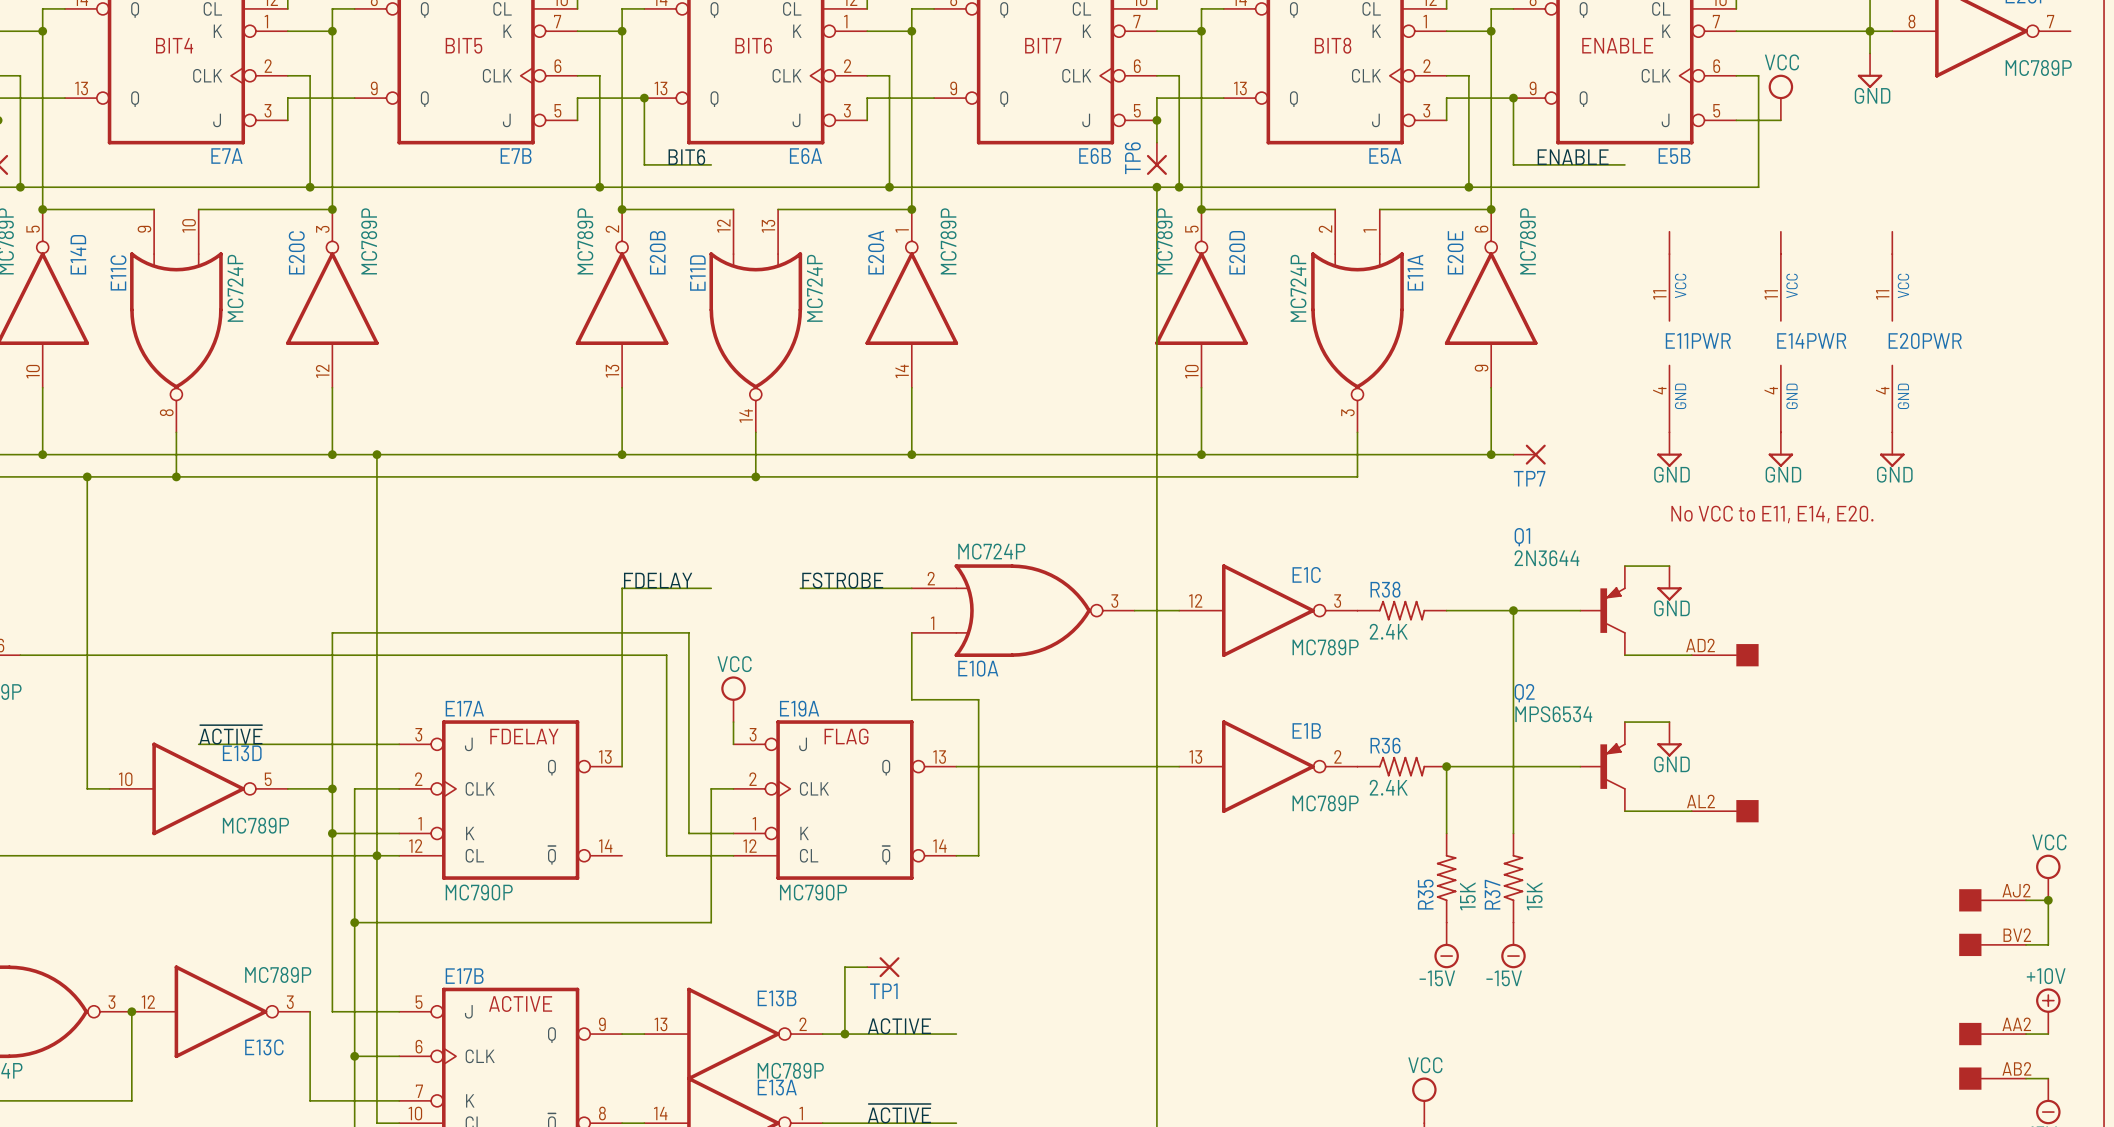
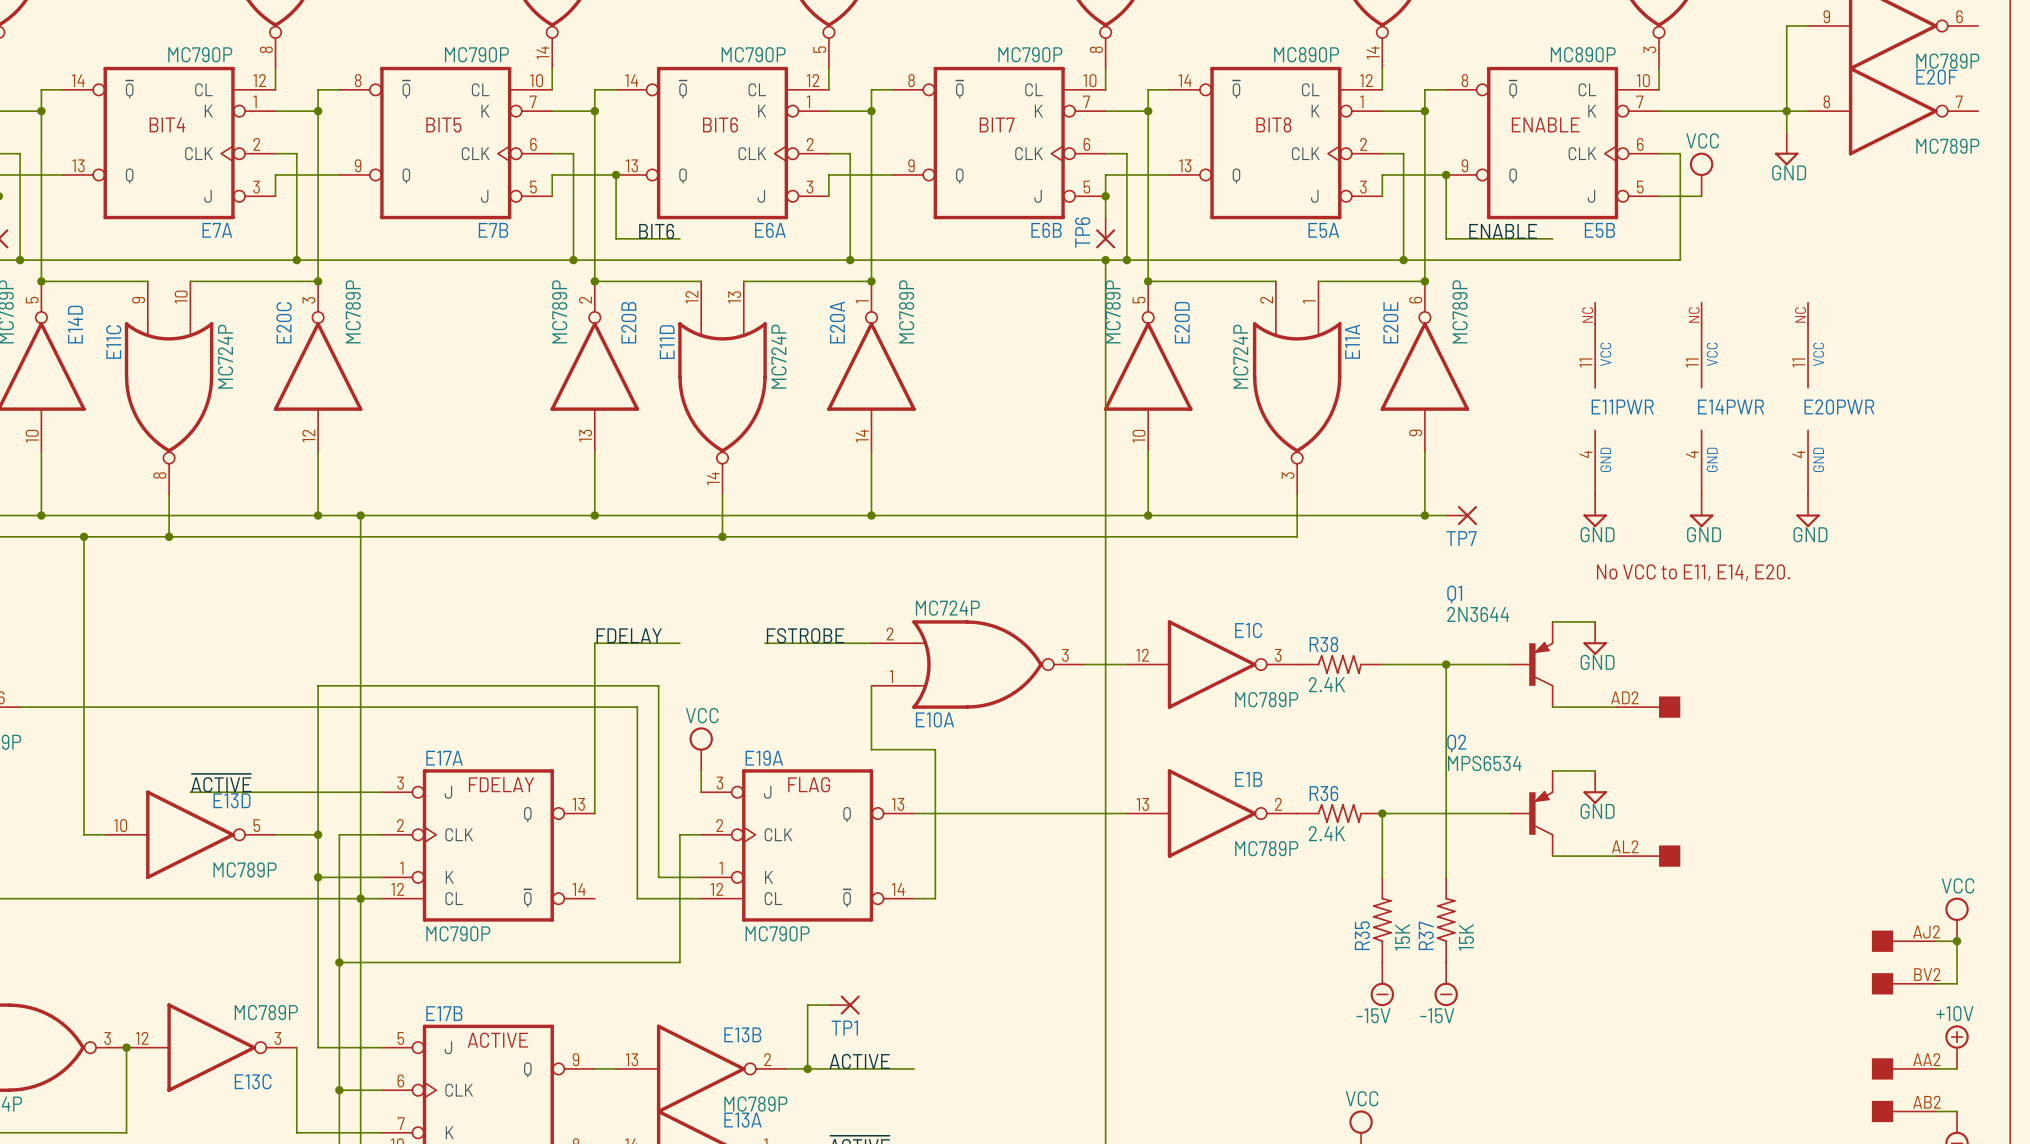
power symbol text: none -> NC (1587, 314)
power symbol text: none -> NC (1694, 314)
power symbol text: none -> NC (1800, 314)

